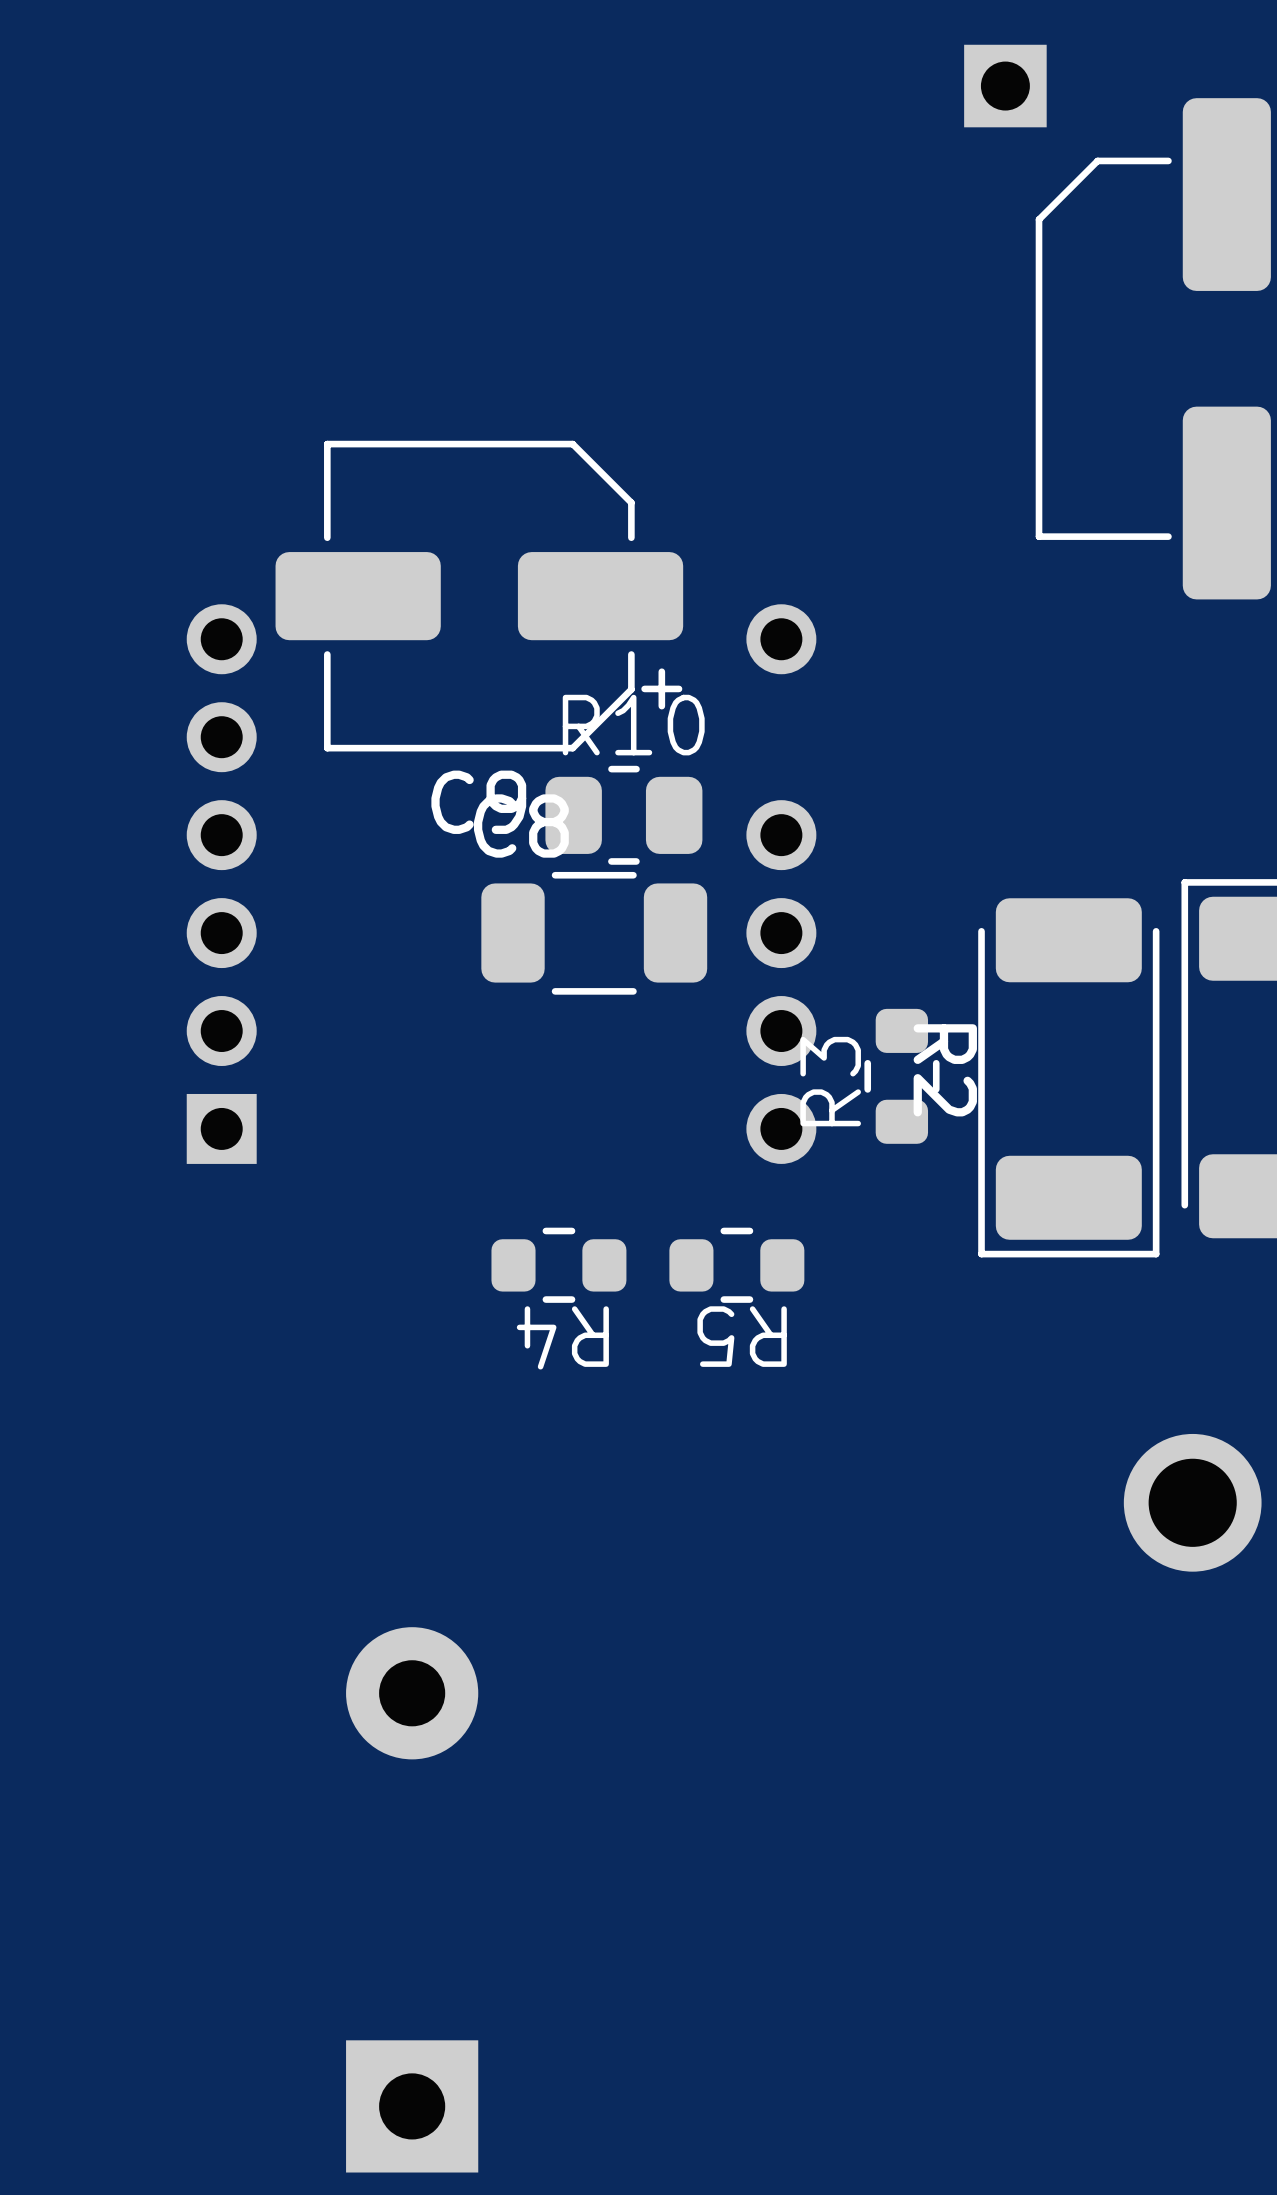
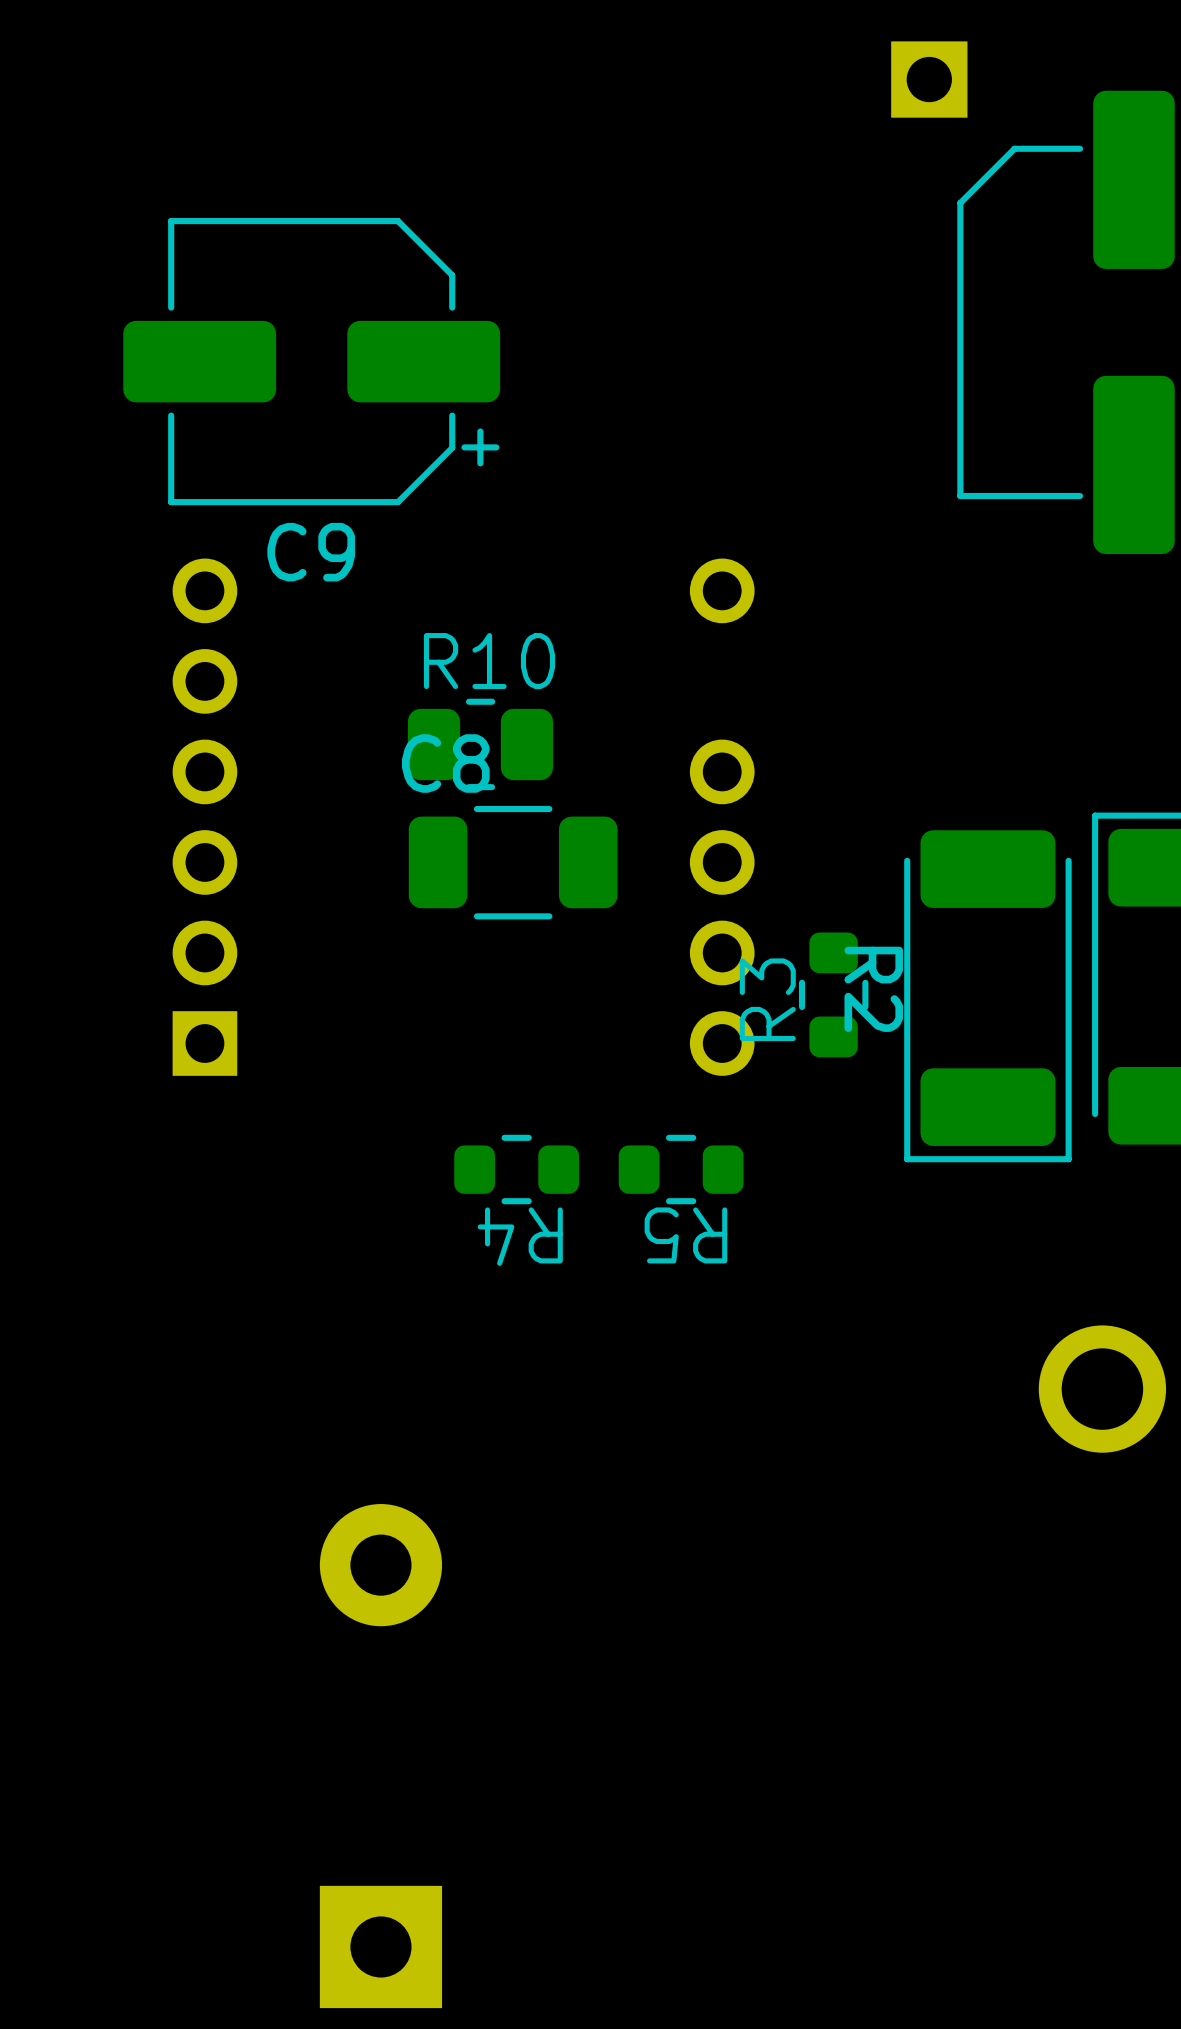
C9 position: (479, 596) -> (311, 361)
R10 position: (623, 815) -> (480, 744)
C8 position: (594, 933) -> (513, 862)

